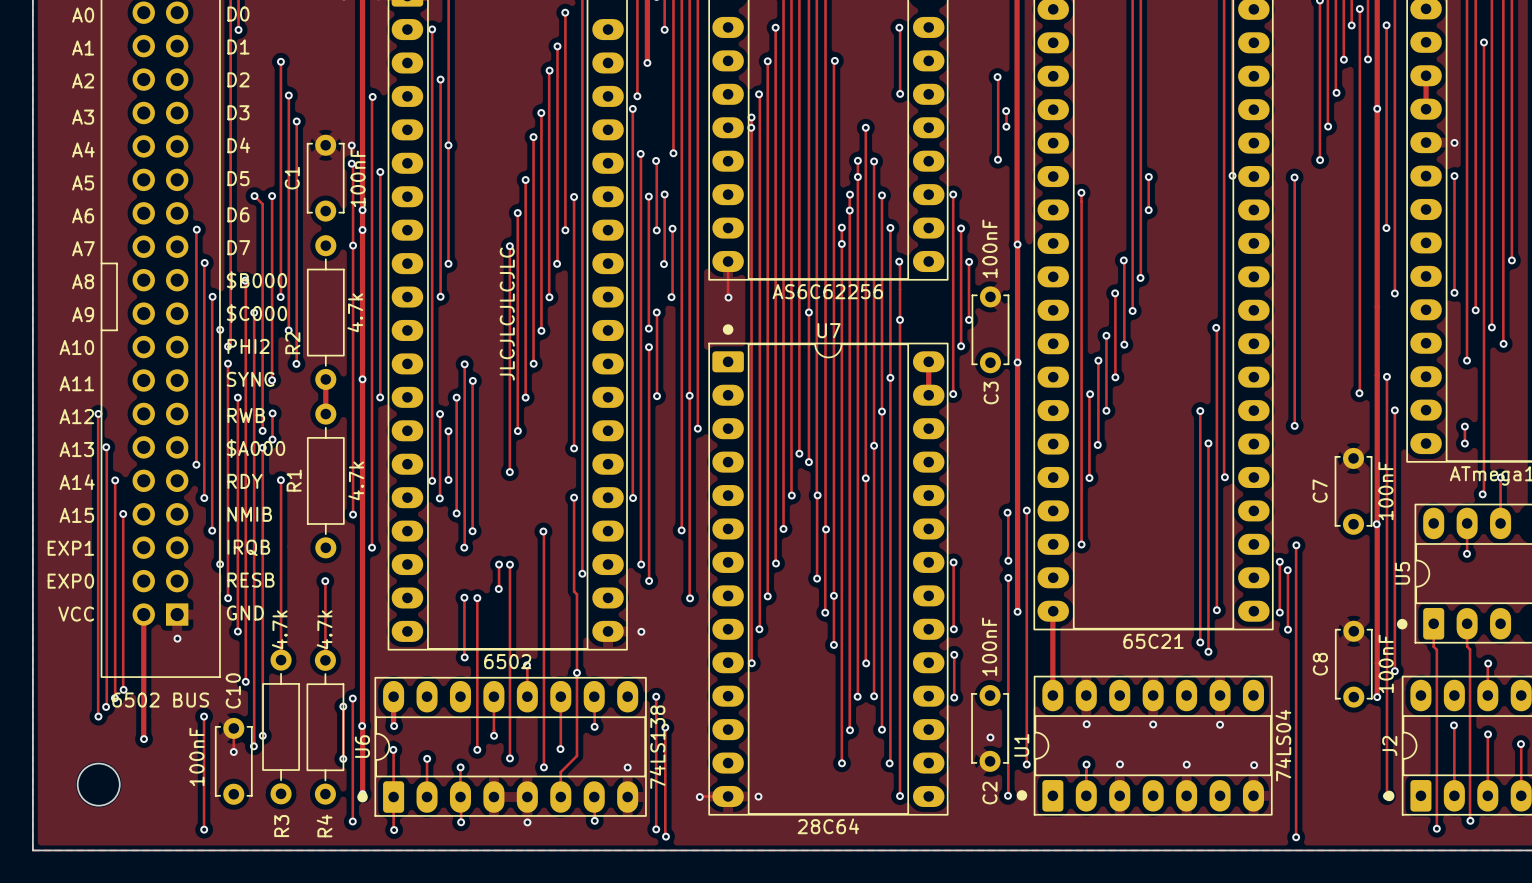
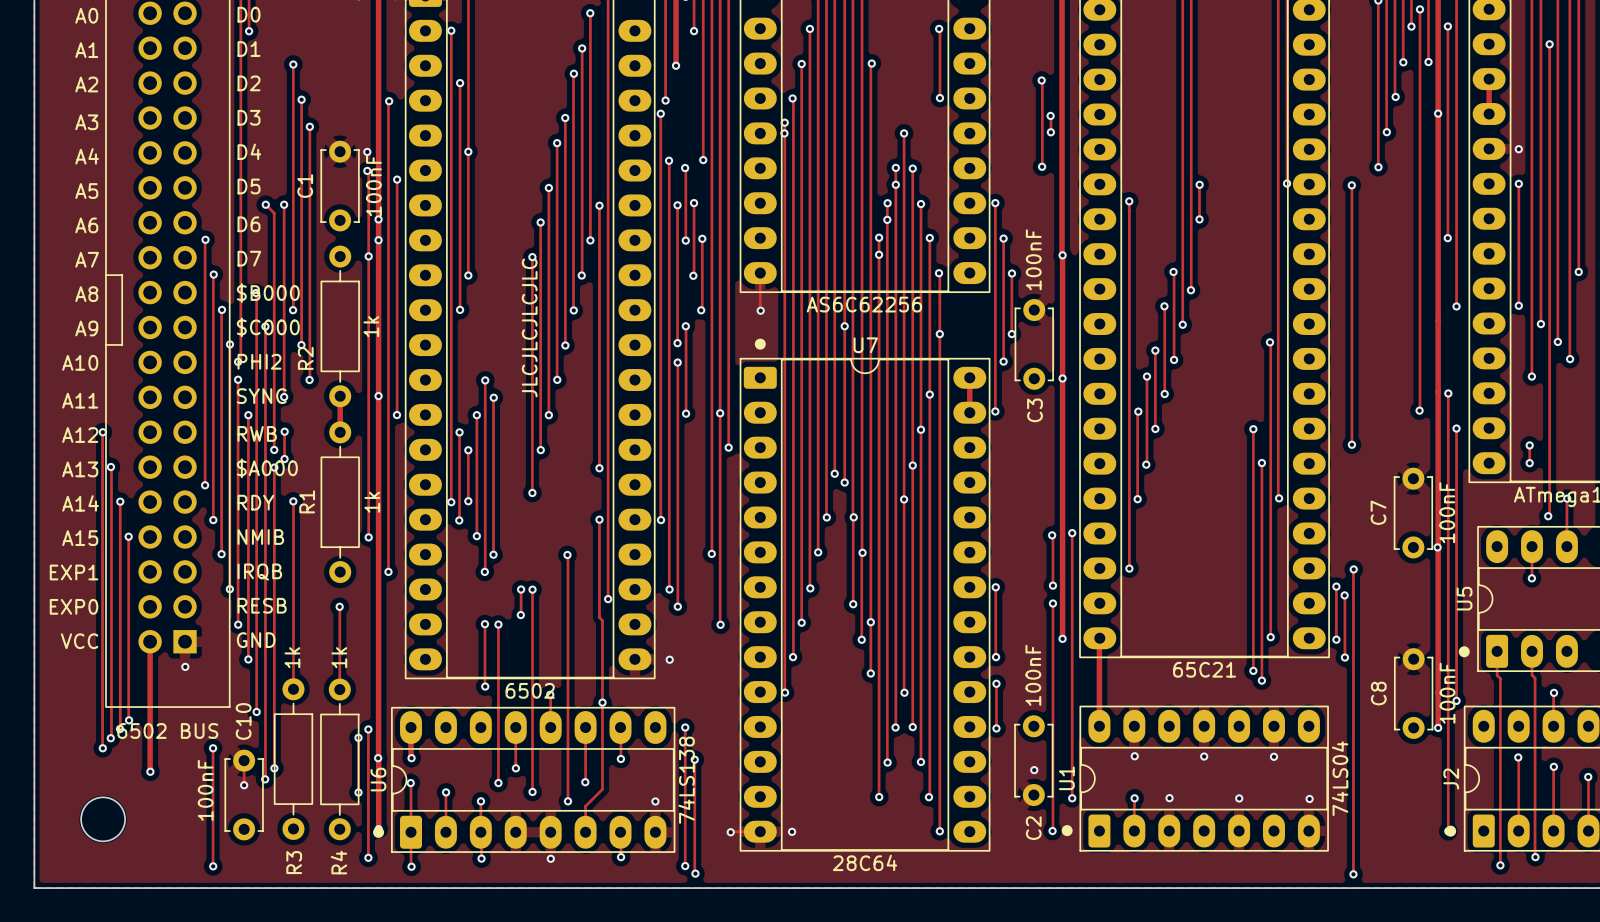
R2 value: 4.7k (355, 312) -> 1k (371, 326)
R1 value: 4.7k (356, 480) -> 1k (372, 502)
R3 value: 4.7k (279, 629) -> 1k (292, 657)
R4 value: 4.7k (324, 629) -> 1k (339, 657)

